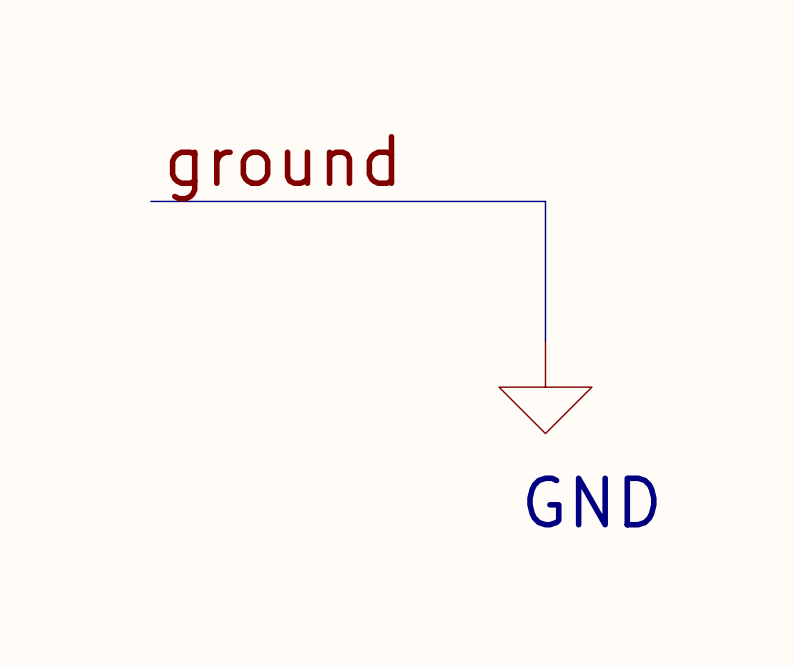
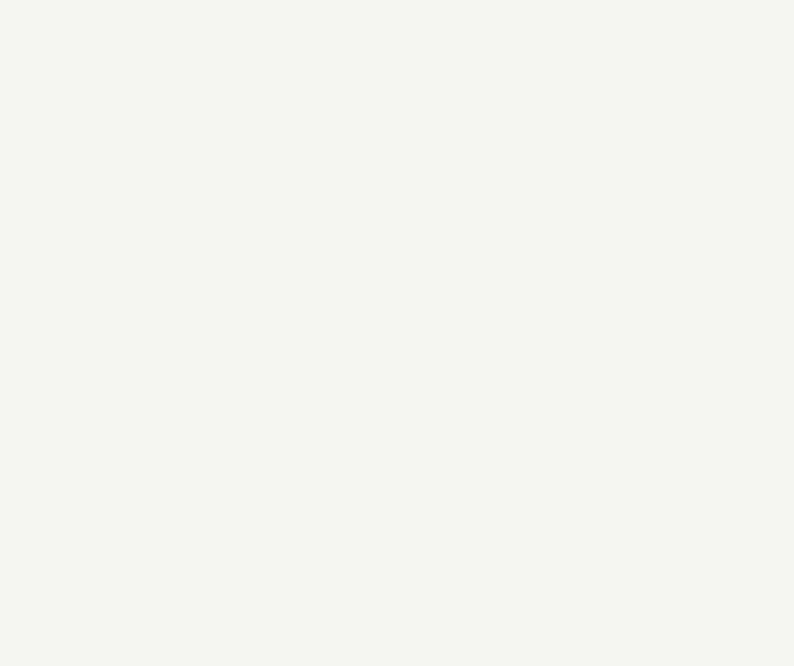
label: ground (282, 167) -> none
wire: (150, 201) (545, 201) (545, 340) -> none
power symbol: GND (545, 387) -> none

